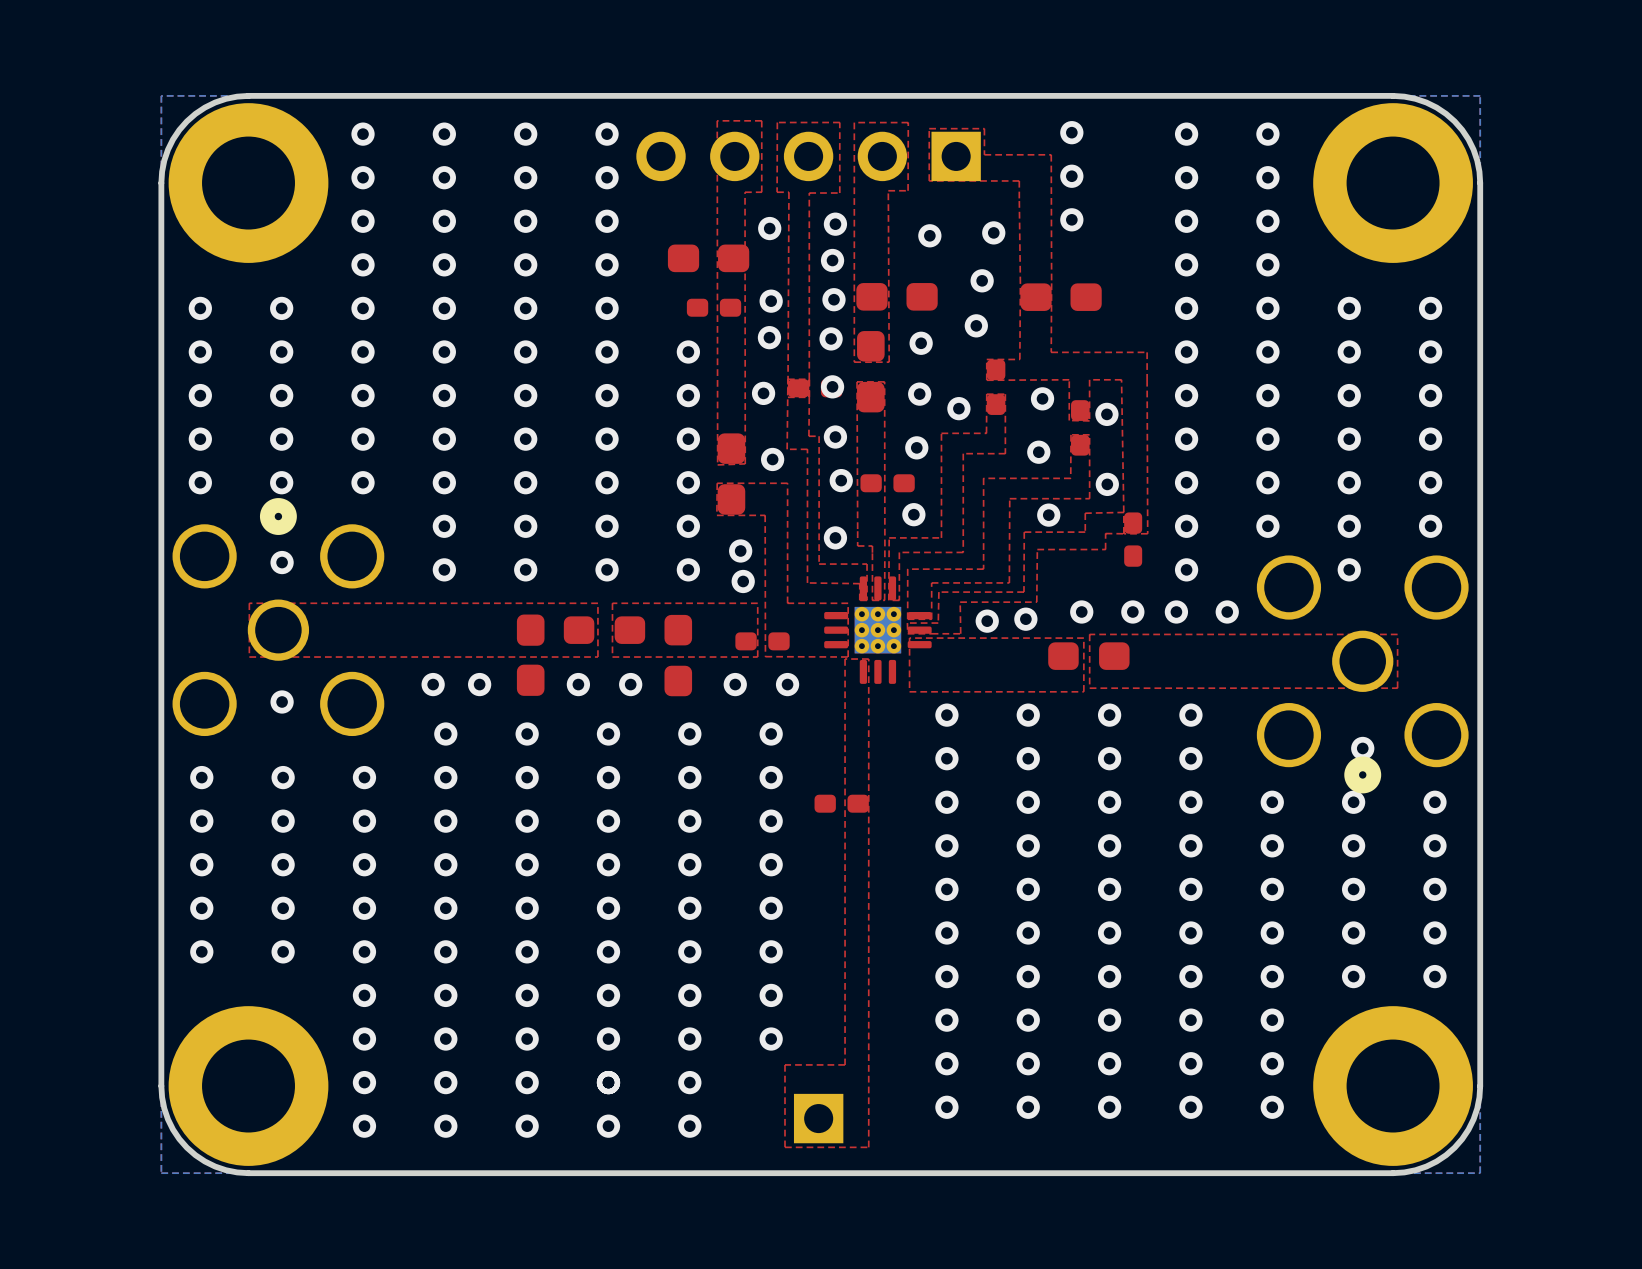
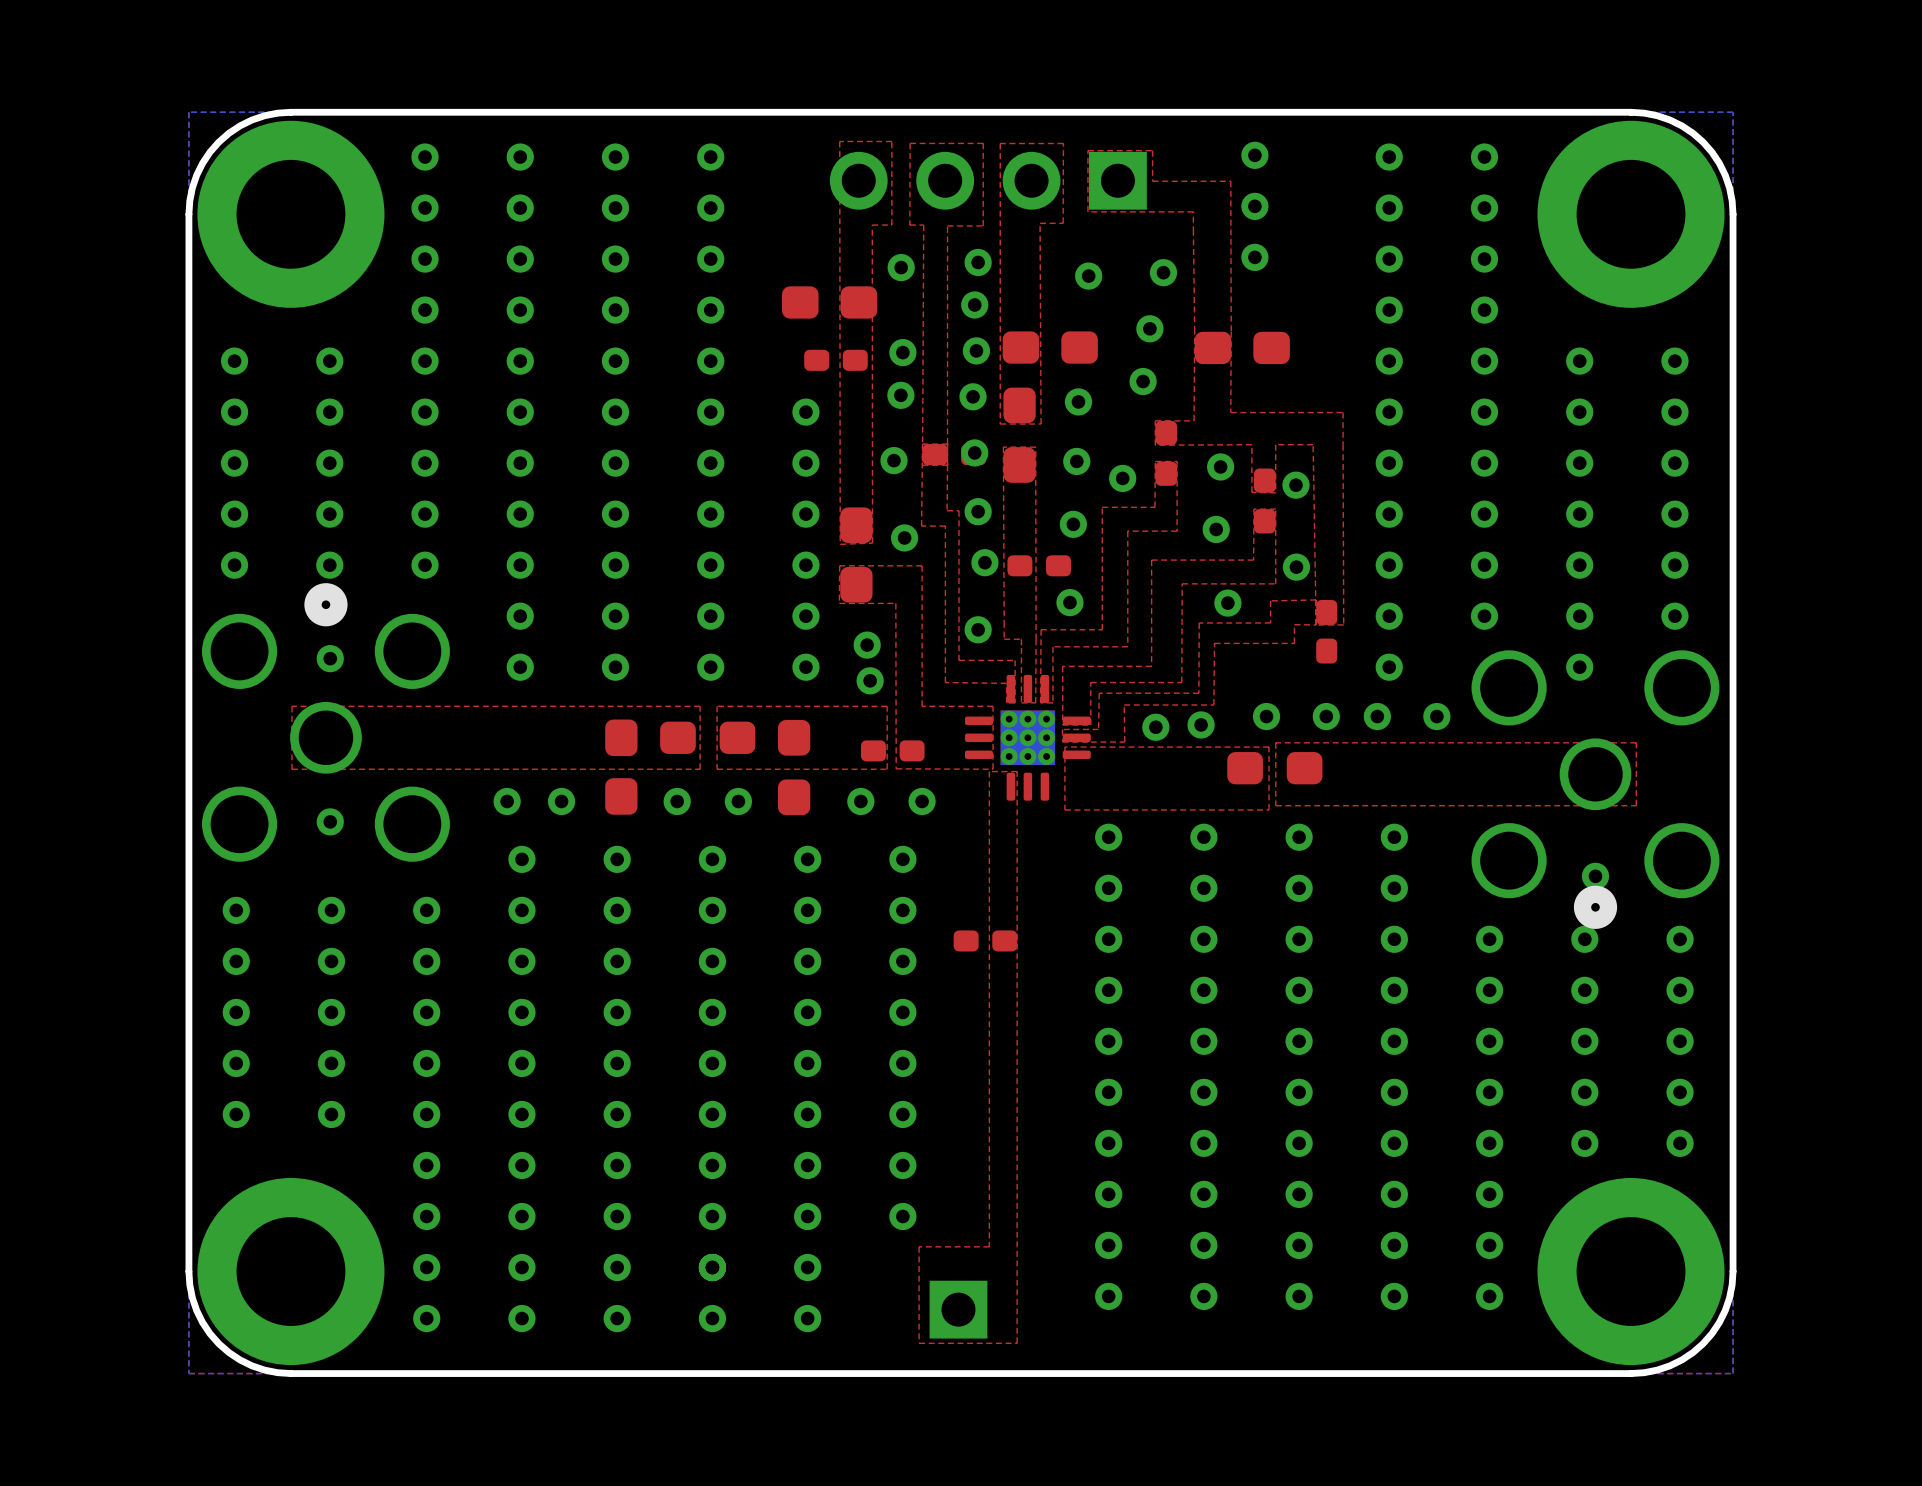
part: none -> (988, 180)
part: (808, 156) -> none

